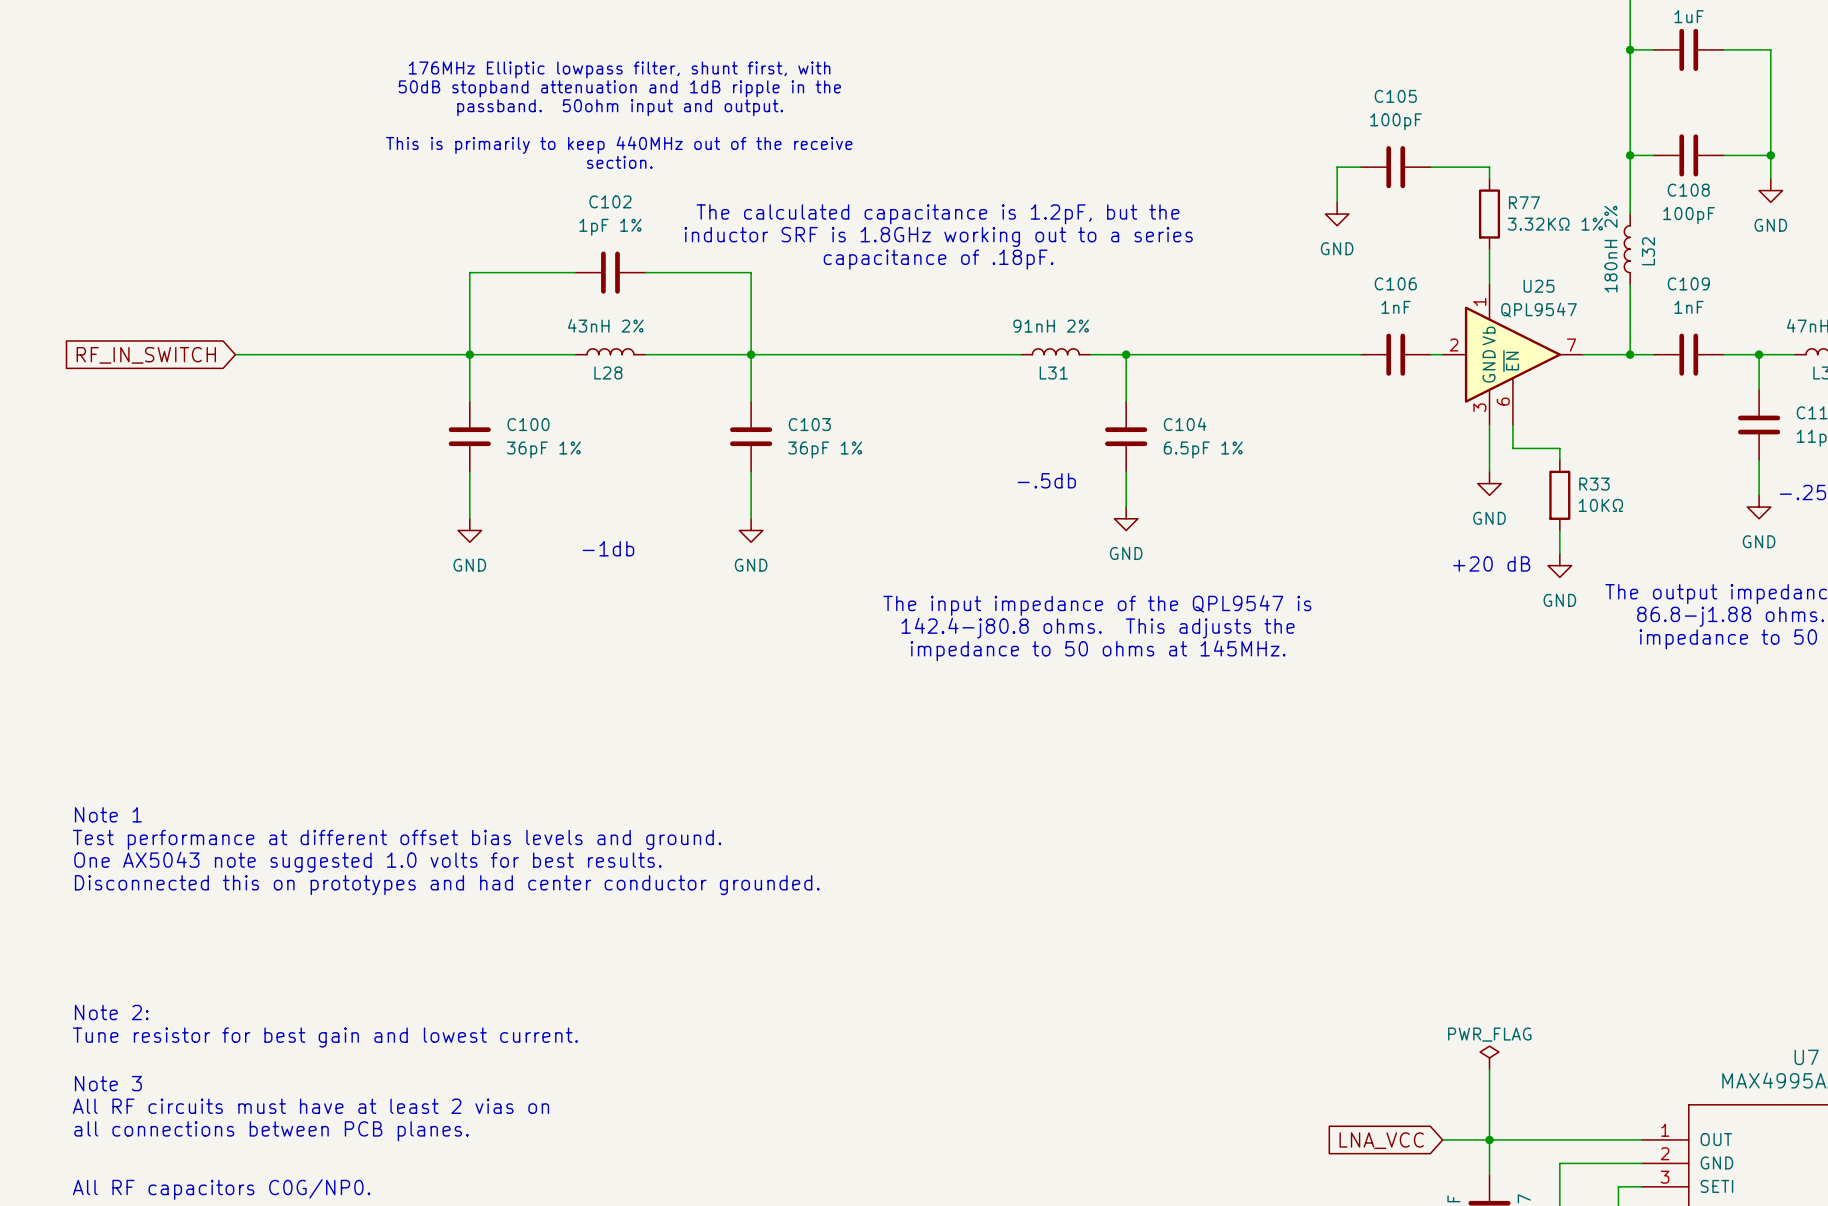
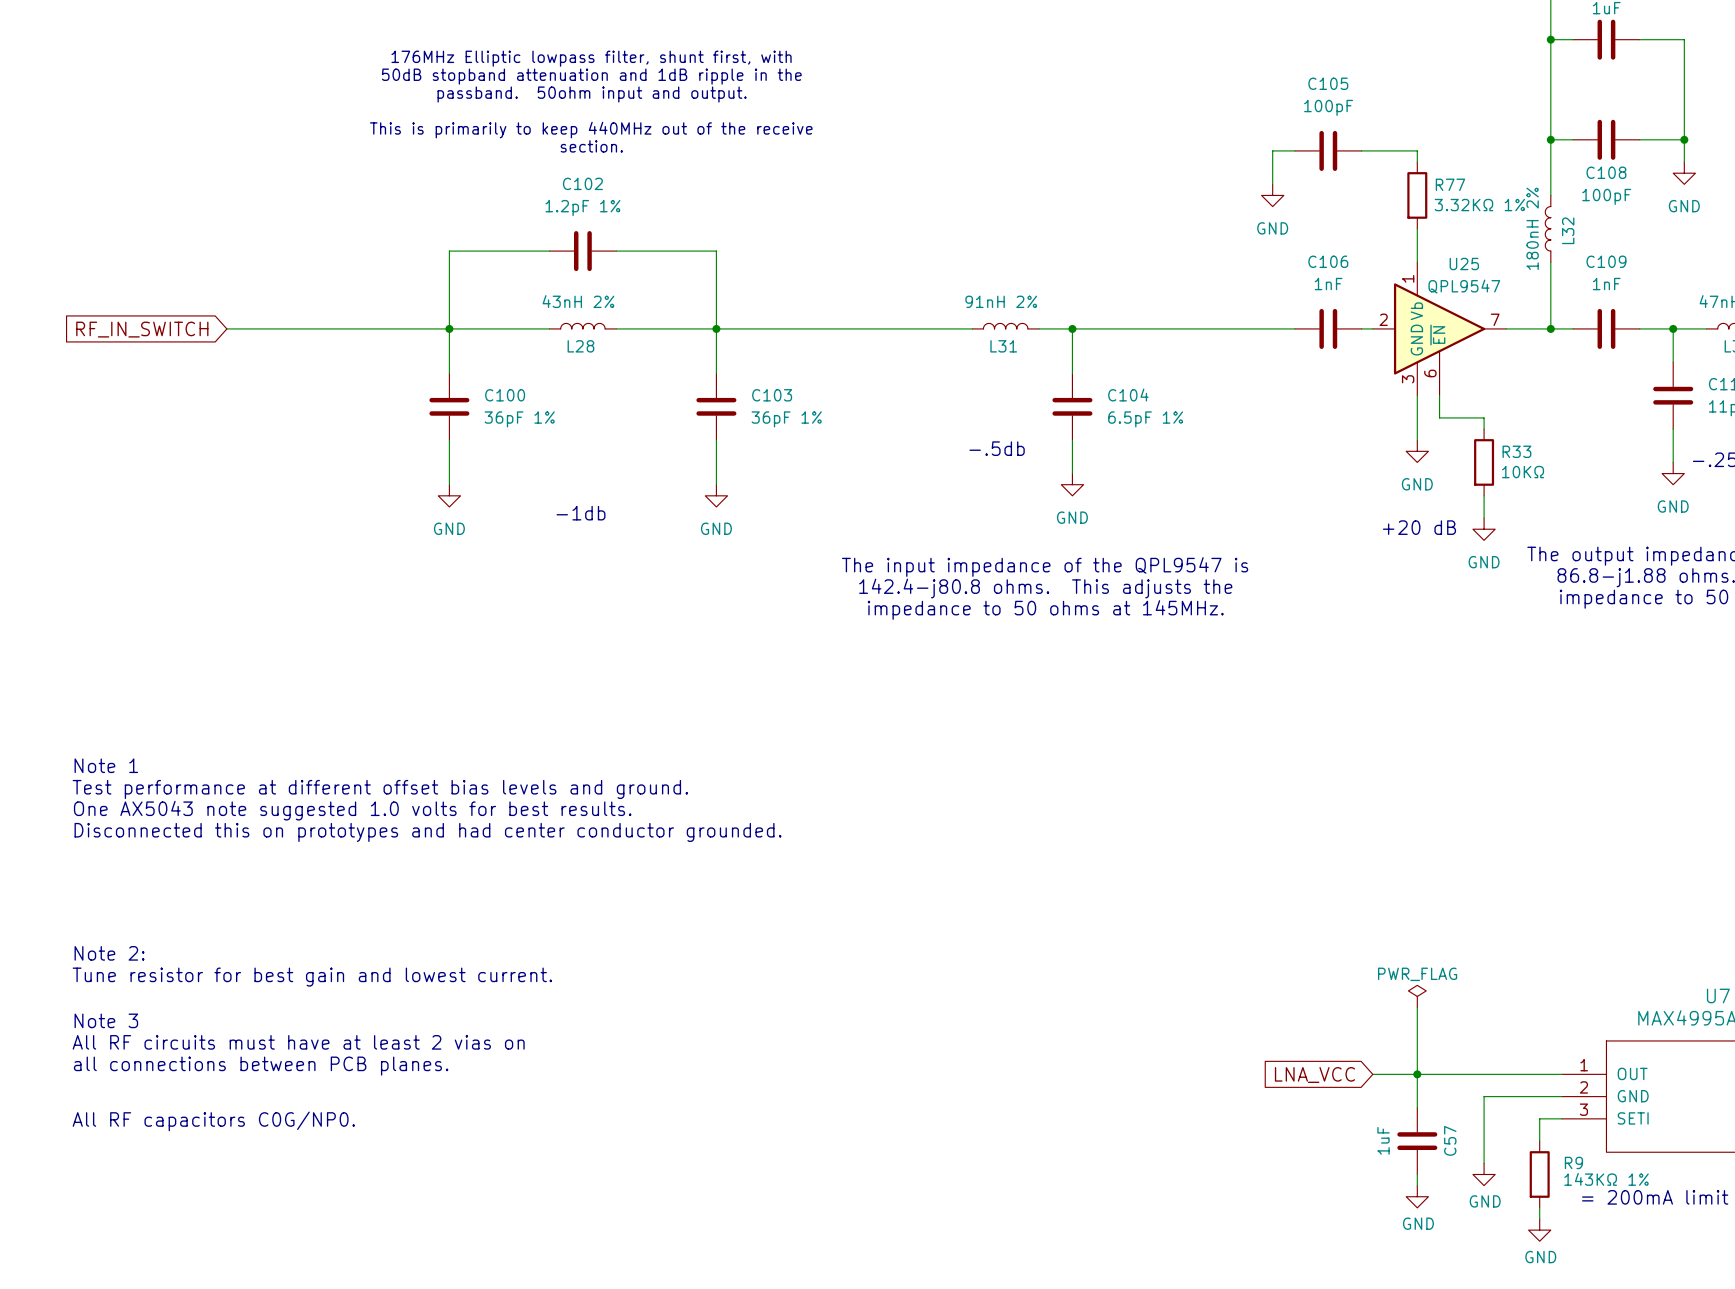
text: The calculated capacitance is 1.2pF, but the (937, 214) -> none
C102 value: 1pF 1% (610, 227) -> 1.2pF 1% (582, 208)
text: inductor SRF is 1.8GHz working out to a series (938, 236) -> none
text: capacitance of .18pF. (938, 259) -> none

